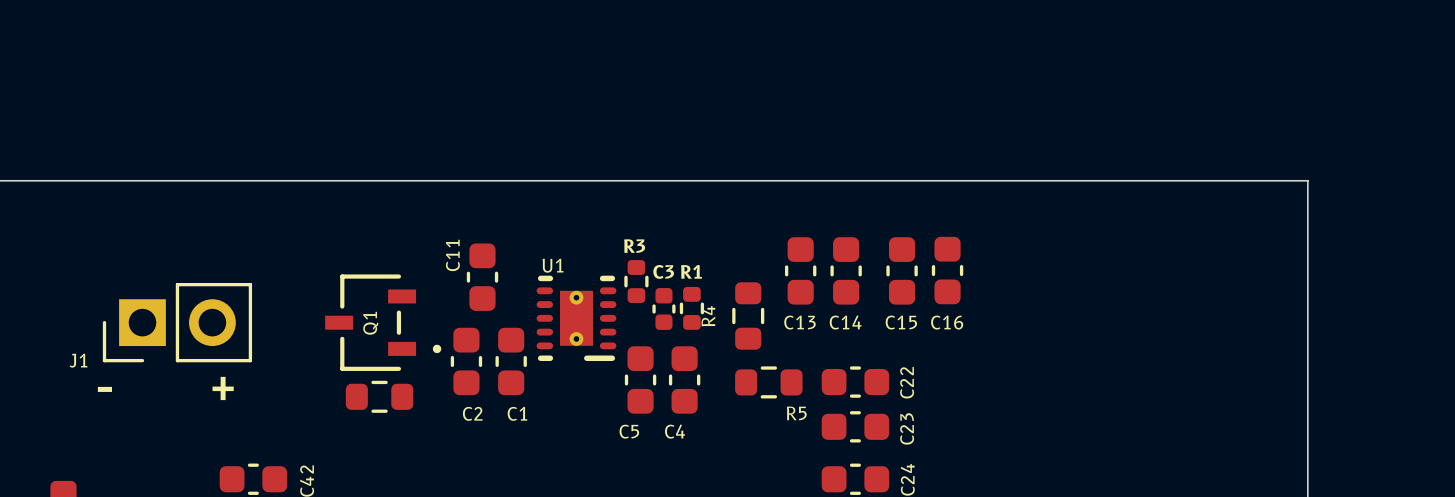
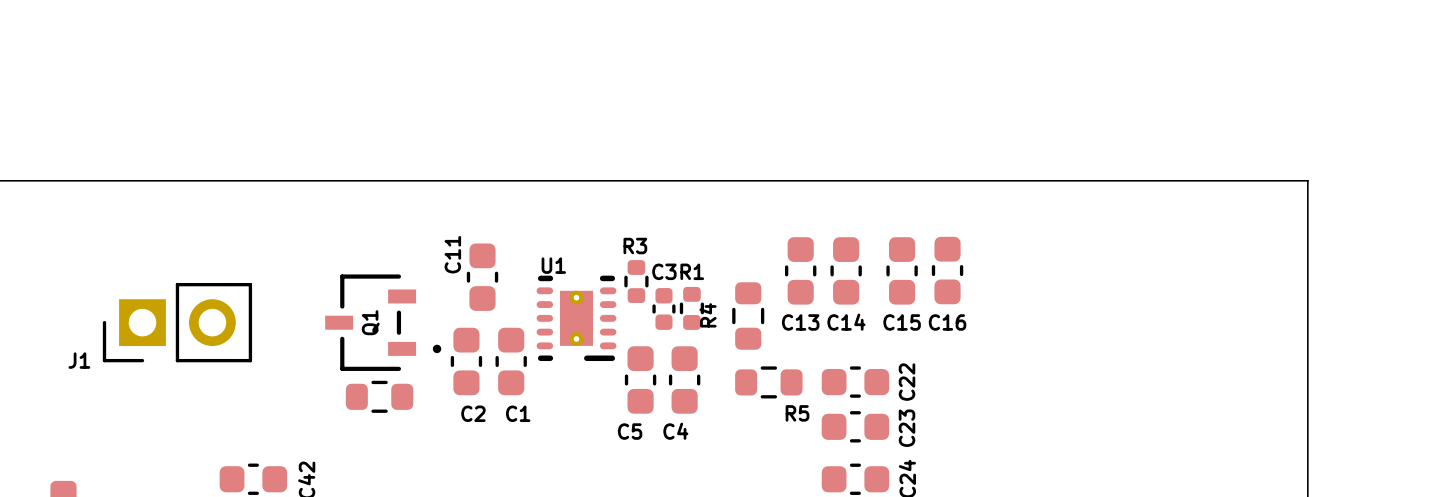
text: + (223, 388) -> none
text: - (104, 389) -> none

